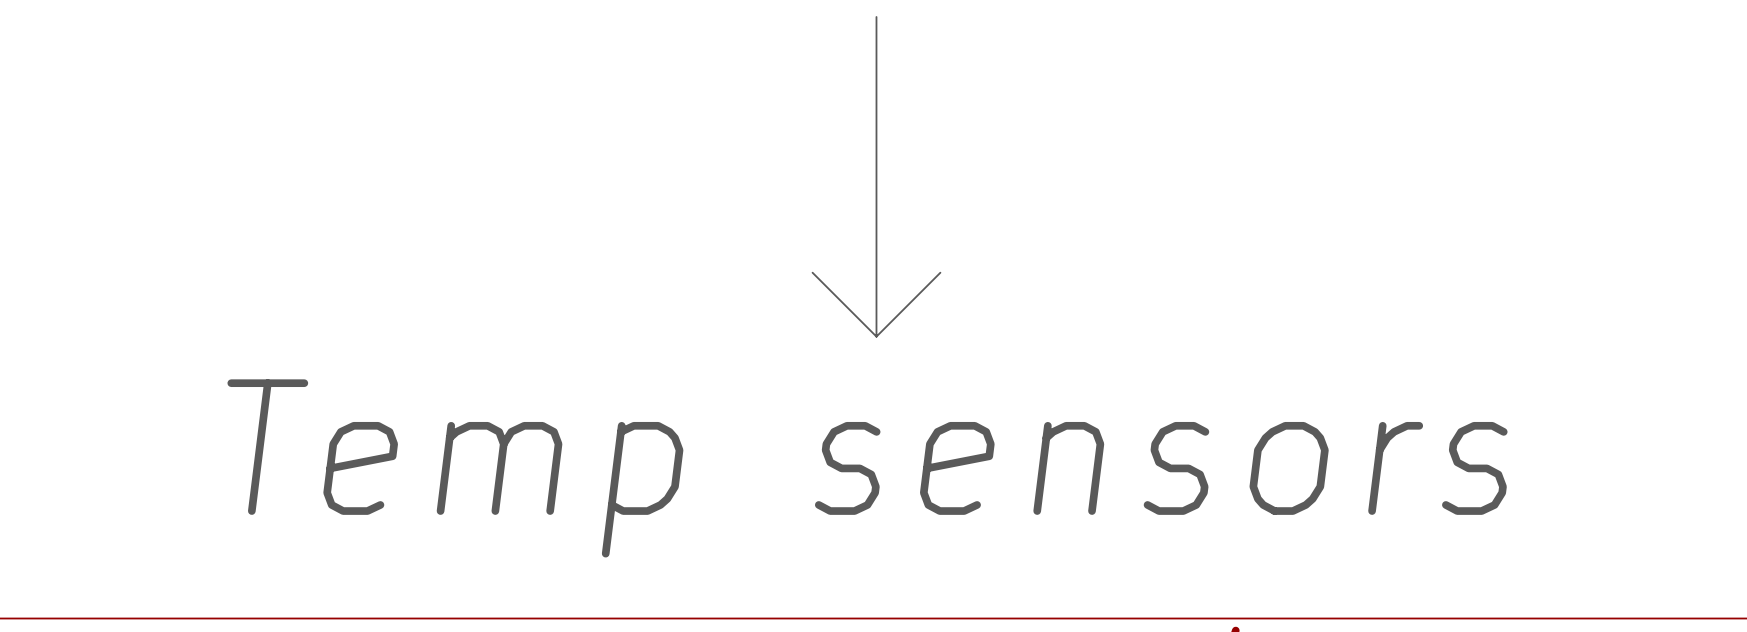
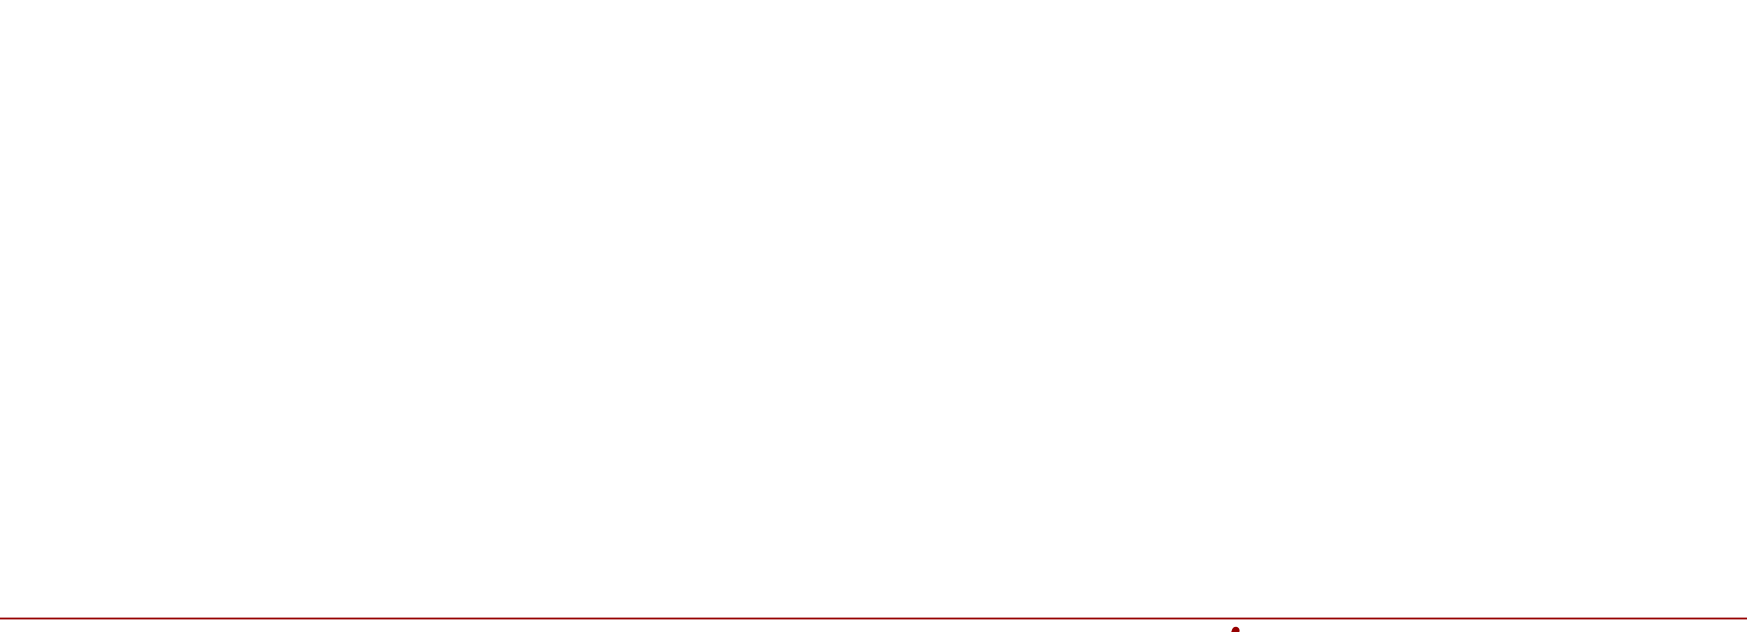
line: (876, 16) (876, 336) -> none
line: (812, 272) (876, 336) -> none
line: (940, 272) (876, 336) -> none
text: Temp sensors (867, 468) -> none

